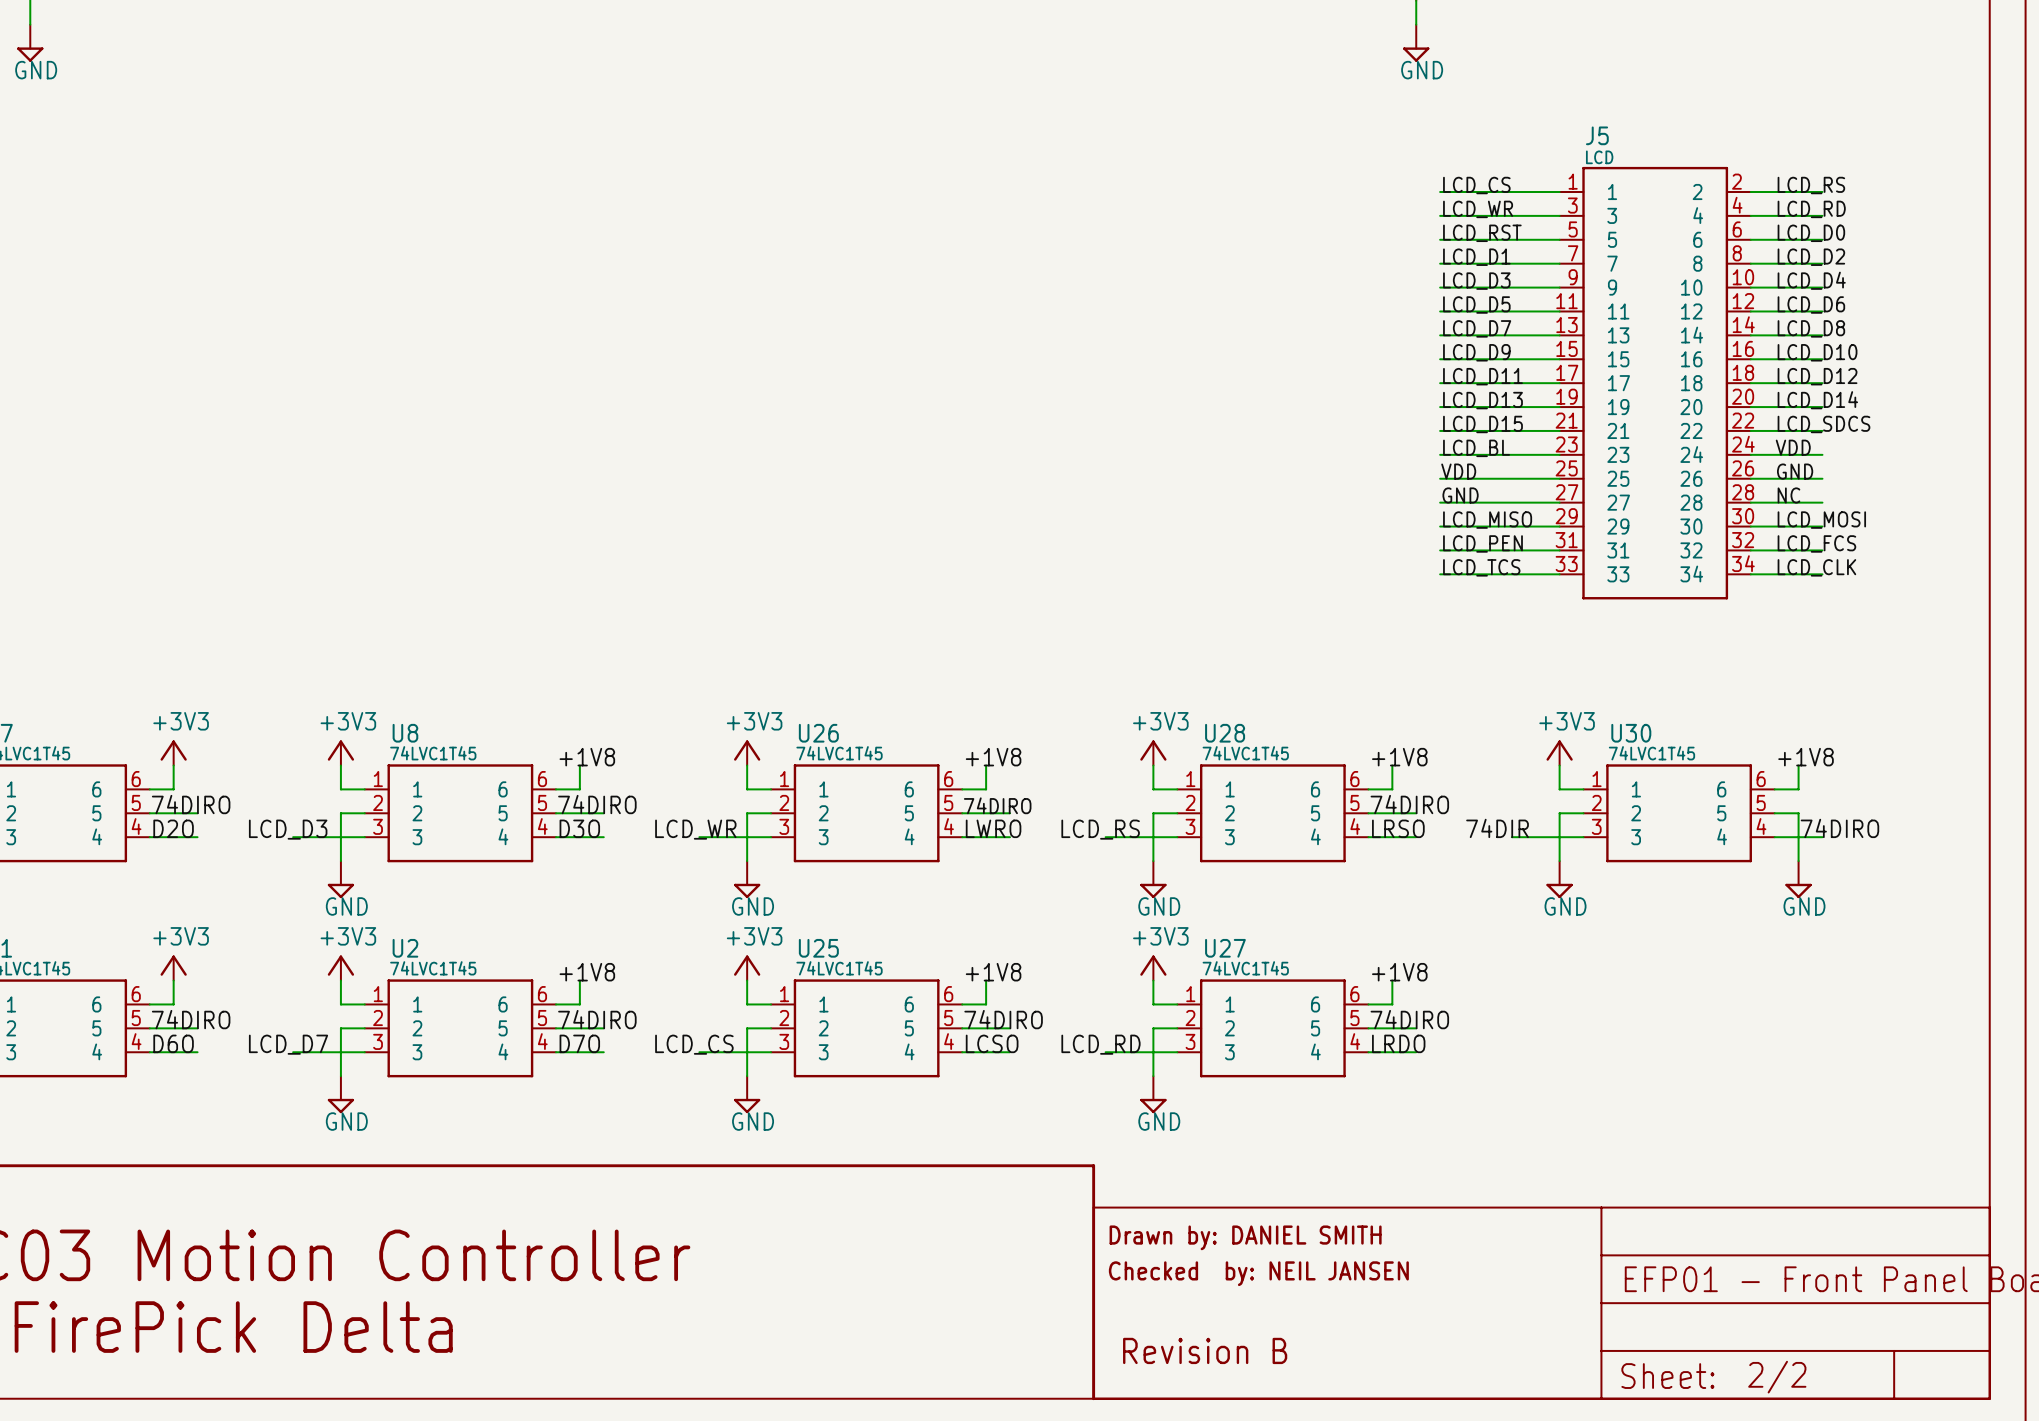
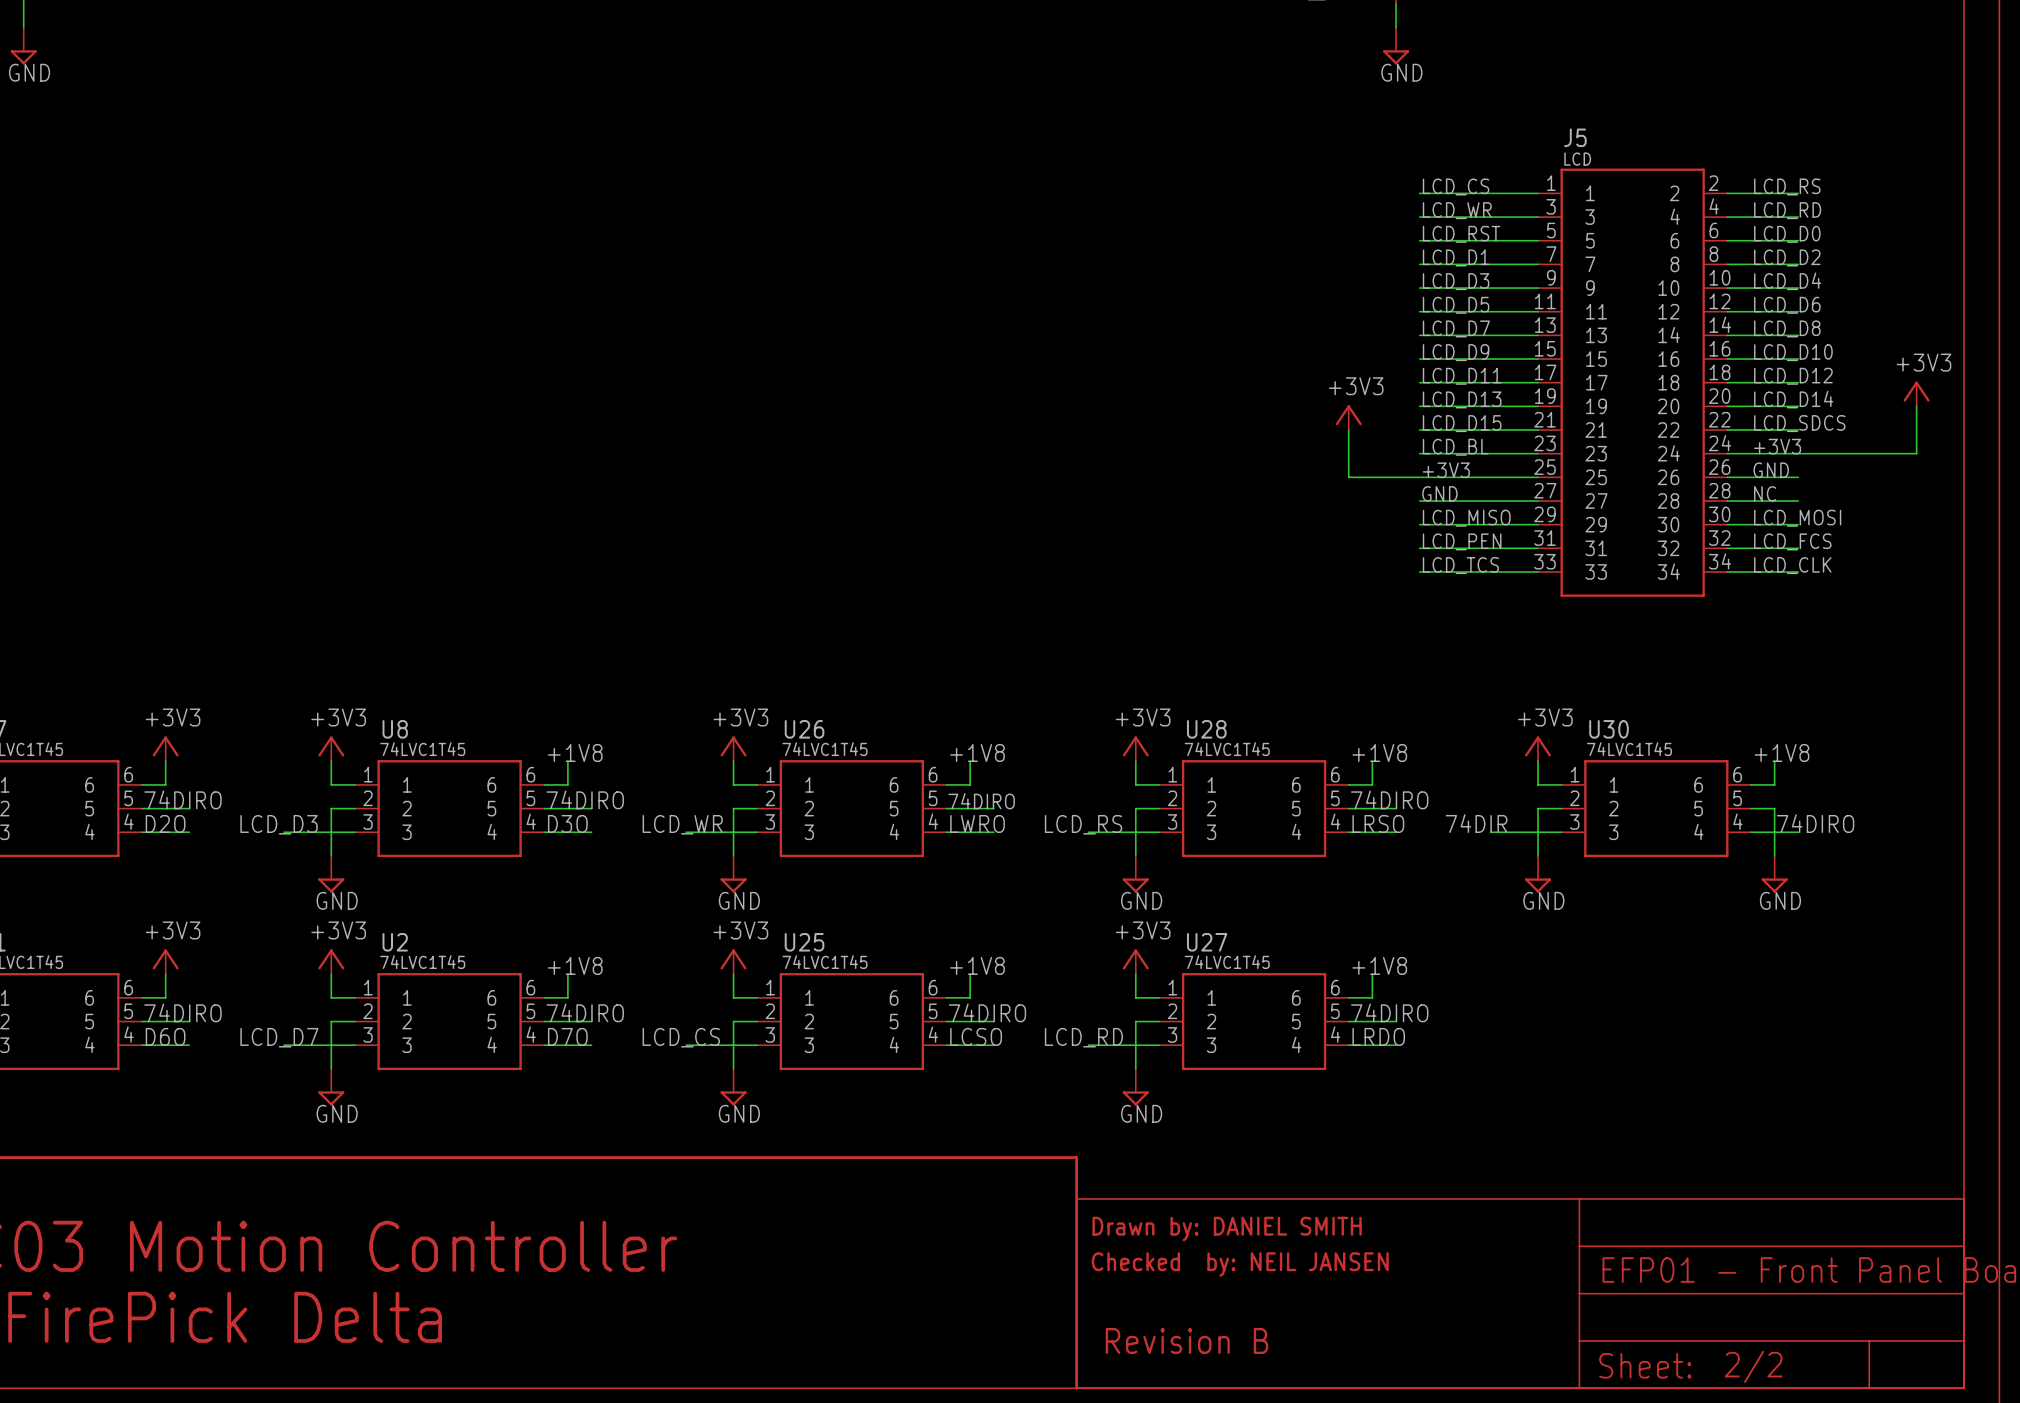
power symbol: none -> +3V3 (1916, 393)
wire: none -> (1916, 406) (1916, 453) (1798, 453)
power symbol: none -> +3V3 (1348, 417)
wire: none -> (1348, 430) (1348, 477) (1419, 477)
label: VDD (1793, 447) -> +3V3 (1777, 446)
label: VDD (1458, 471) -> +3V3 (1446, 470)

